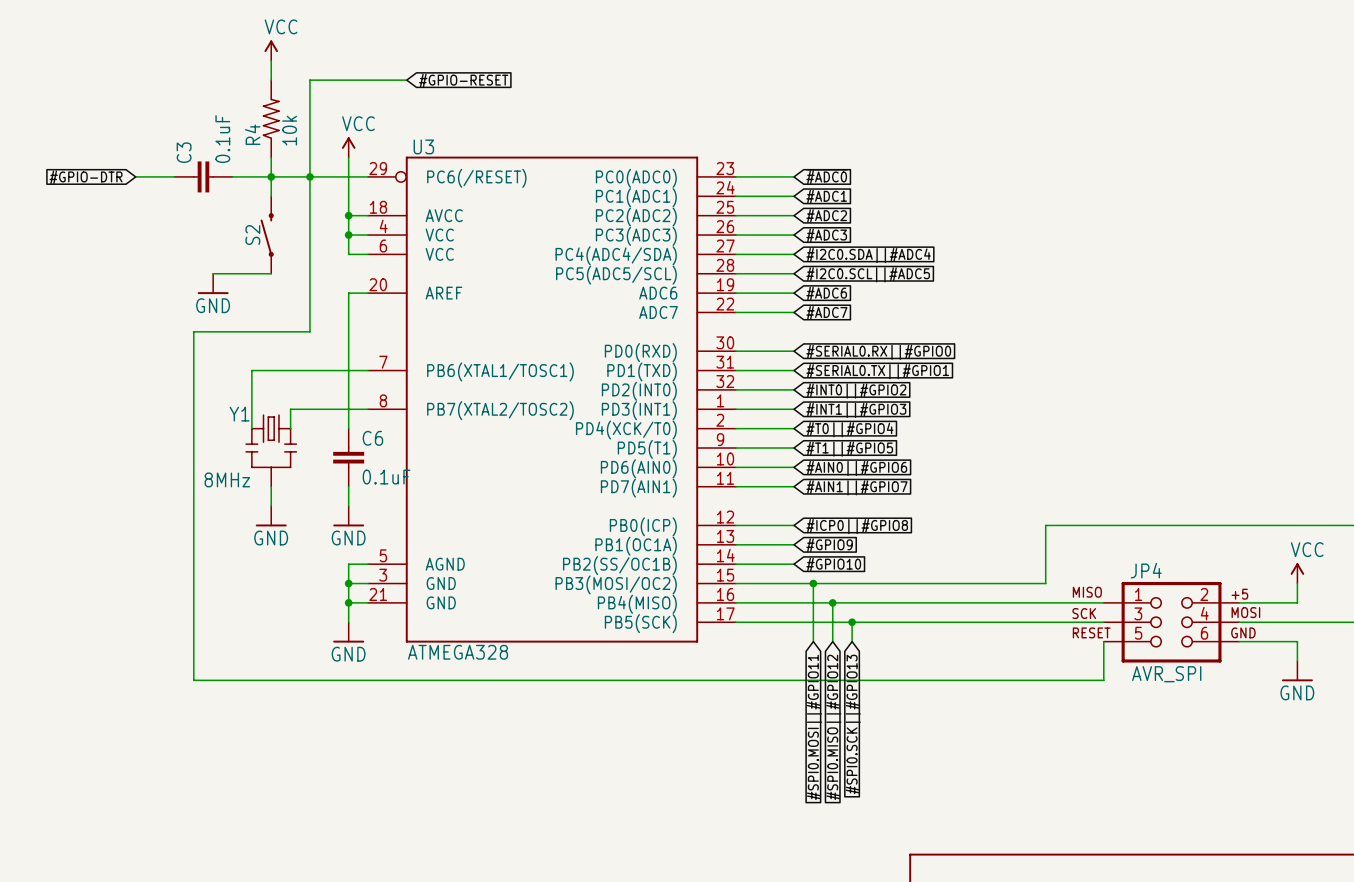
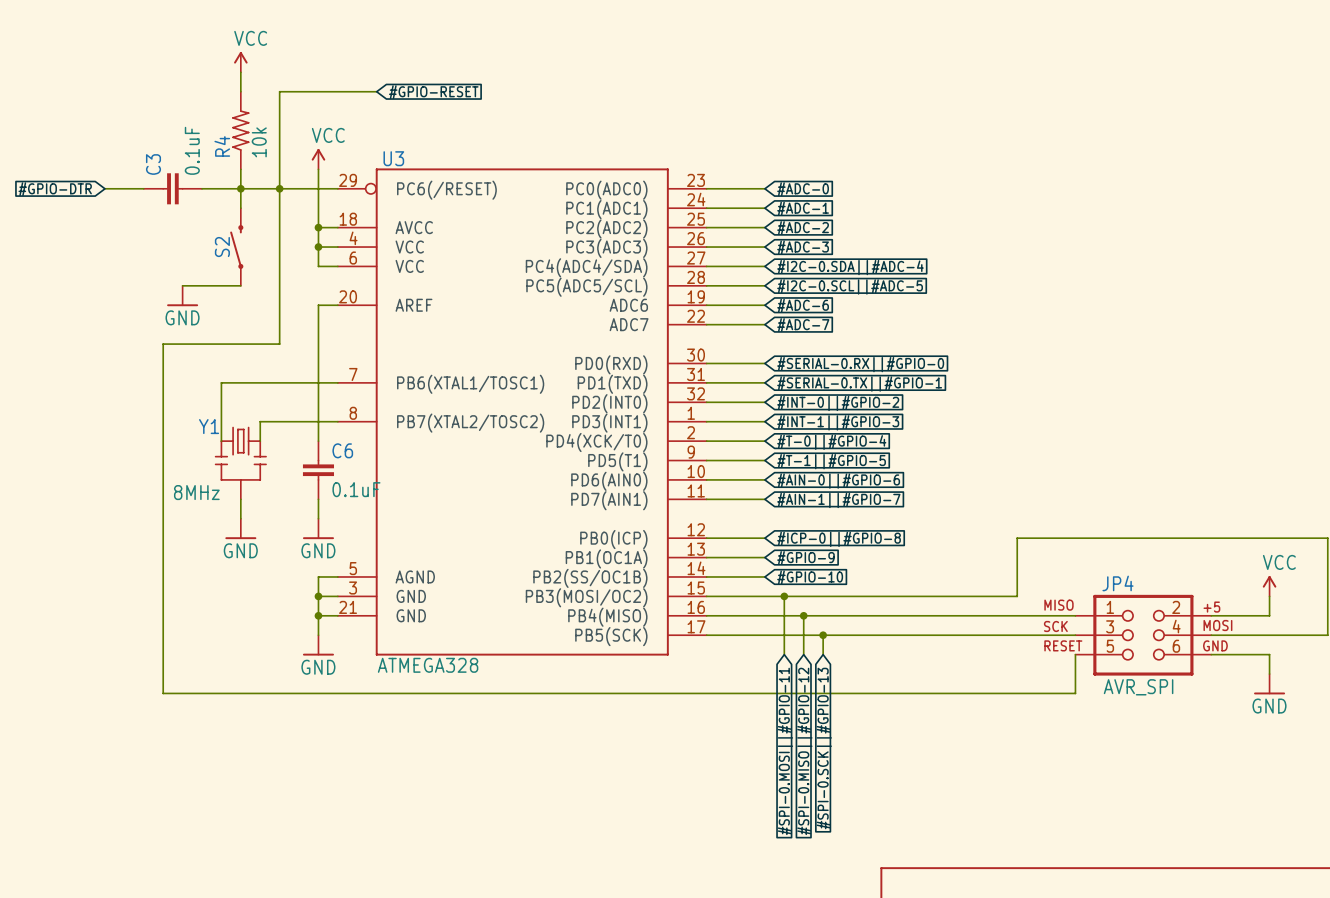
global label: ~{#ADC0} (827, 176) -> #ADC-0 (803, 189)
global label: #ADC1 (826, 196) -> #ADC-1 (803, 208)
global label: #ADC2 (826, 216) -> #ADC-2 (803, 228)
global label: #ADC3 (826, 235) -> #ADC-3 (803, 247)
global label: #I2C0.SDA||#ADC4 (868, 255) -> #I2C-0.SDA||#ADC-4 (850, 267)
global label: #I2C0.SCL||#ADC5 (868, 274) -> #I2C-0.SCL||#ADC-5 (850, 287)
global label: #ADC6 (826, 293) -> #ADC-6 (803, 305)
global label: #ADC7 (826, 312) -> #ADC-7 (803, 325)
global label: #SERIAL0.RX||#GPIO0 (878, 352) -> #SERIAL-0.RX||#GPIO-0 (860, 364)
global label: #SERIAL0.TX||#GPIO1 (877, 371) -> #SERIAL-0.TX||#GPIO-1 (859, 384)
global label: #INT0||#GPIO2 (856, 391) -> #INT-0||#GPIO-2 (838, 403)
global label: #INT1||#GPIO3 (856, 410) -> #INT-1||#GPIO-3 (838, 422)
global label: #T0||#GPIO4 (849, 429) -> #T-0||#GPIO-4 (831, 442)
global label: #T1||#GPIO5 (849, 449) -> #T-1||#GPIO-5 (831, 461)
global label: #AIN0||#GPIO6 (856, 468) -> #AIN-0||#GPIO-6 (838, 481)
global label: #AIN1||#GPIO7 (856, 487) -> #AIN-1||#GPIO-7 (838, 500)
global label: #ICP0||#GPIO8 (857, 526) -> #ICP-0||#GPIO-8 (839, 539)
global label: #GPIO9 (829, 545) -> #GPIO-9 (805, 558)
global label: #GPIO10 (833, 564) -> #GPIO-10 (810, 577)
global label: #SPI0.SCK||#GPIO13 (853, 724) -> #SPI-0.SCK||#GPIO-13 (824, 748)
global label: #SPI0.MOSI||#GPIO11 (814, 727) -> #SPI-0.MOSI||#GPIO-11 (785, 751)
global label: #SPI0.MISO||#GPIO12 (833, 727) -> #SPI-0.MISO||#GPIO-12 (804, 751)

